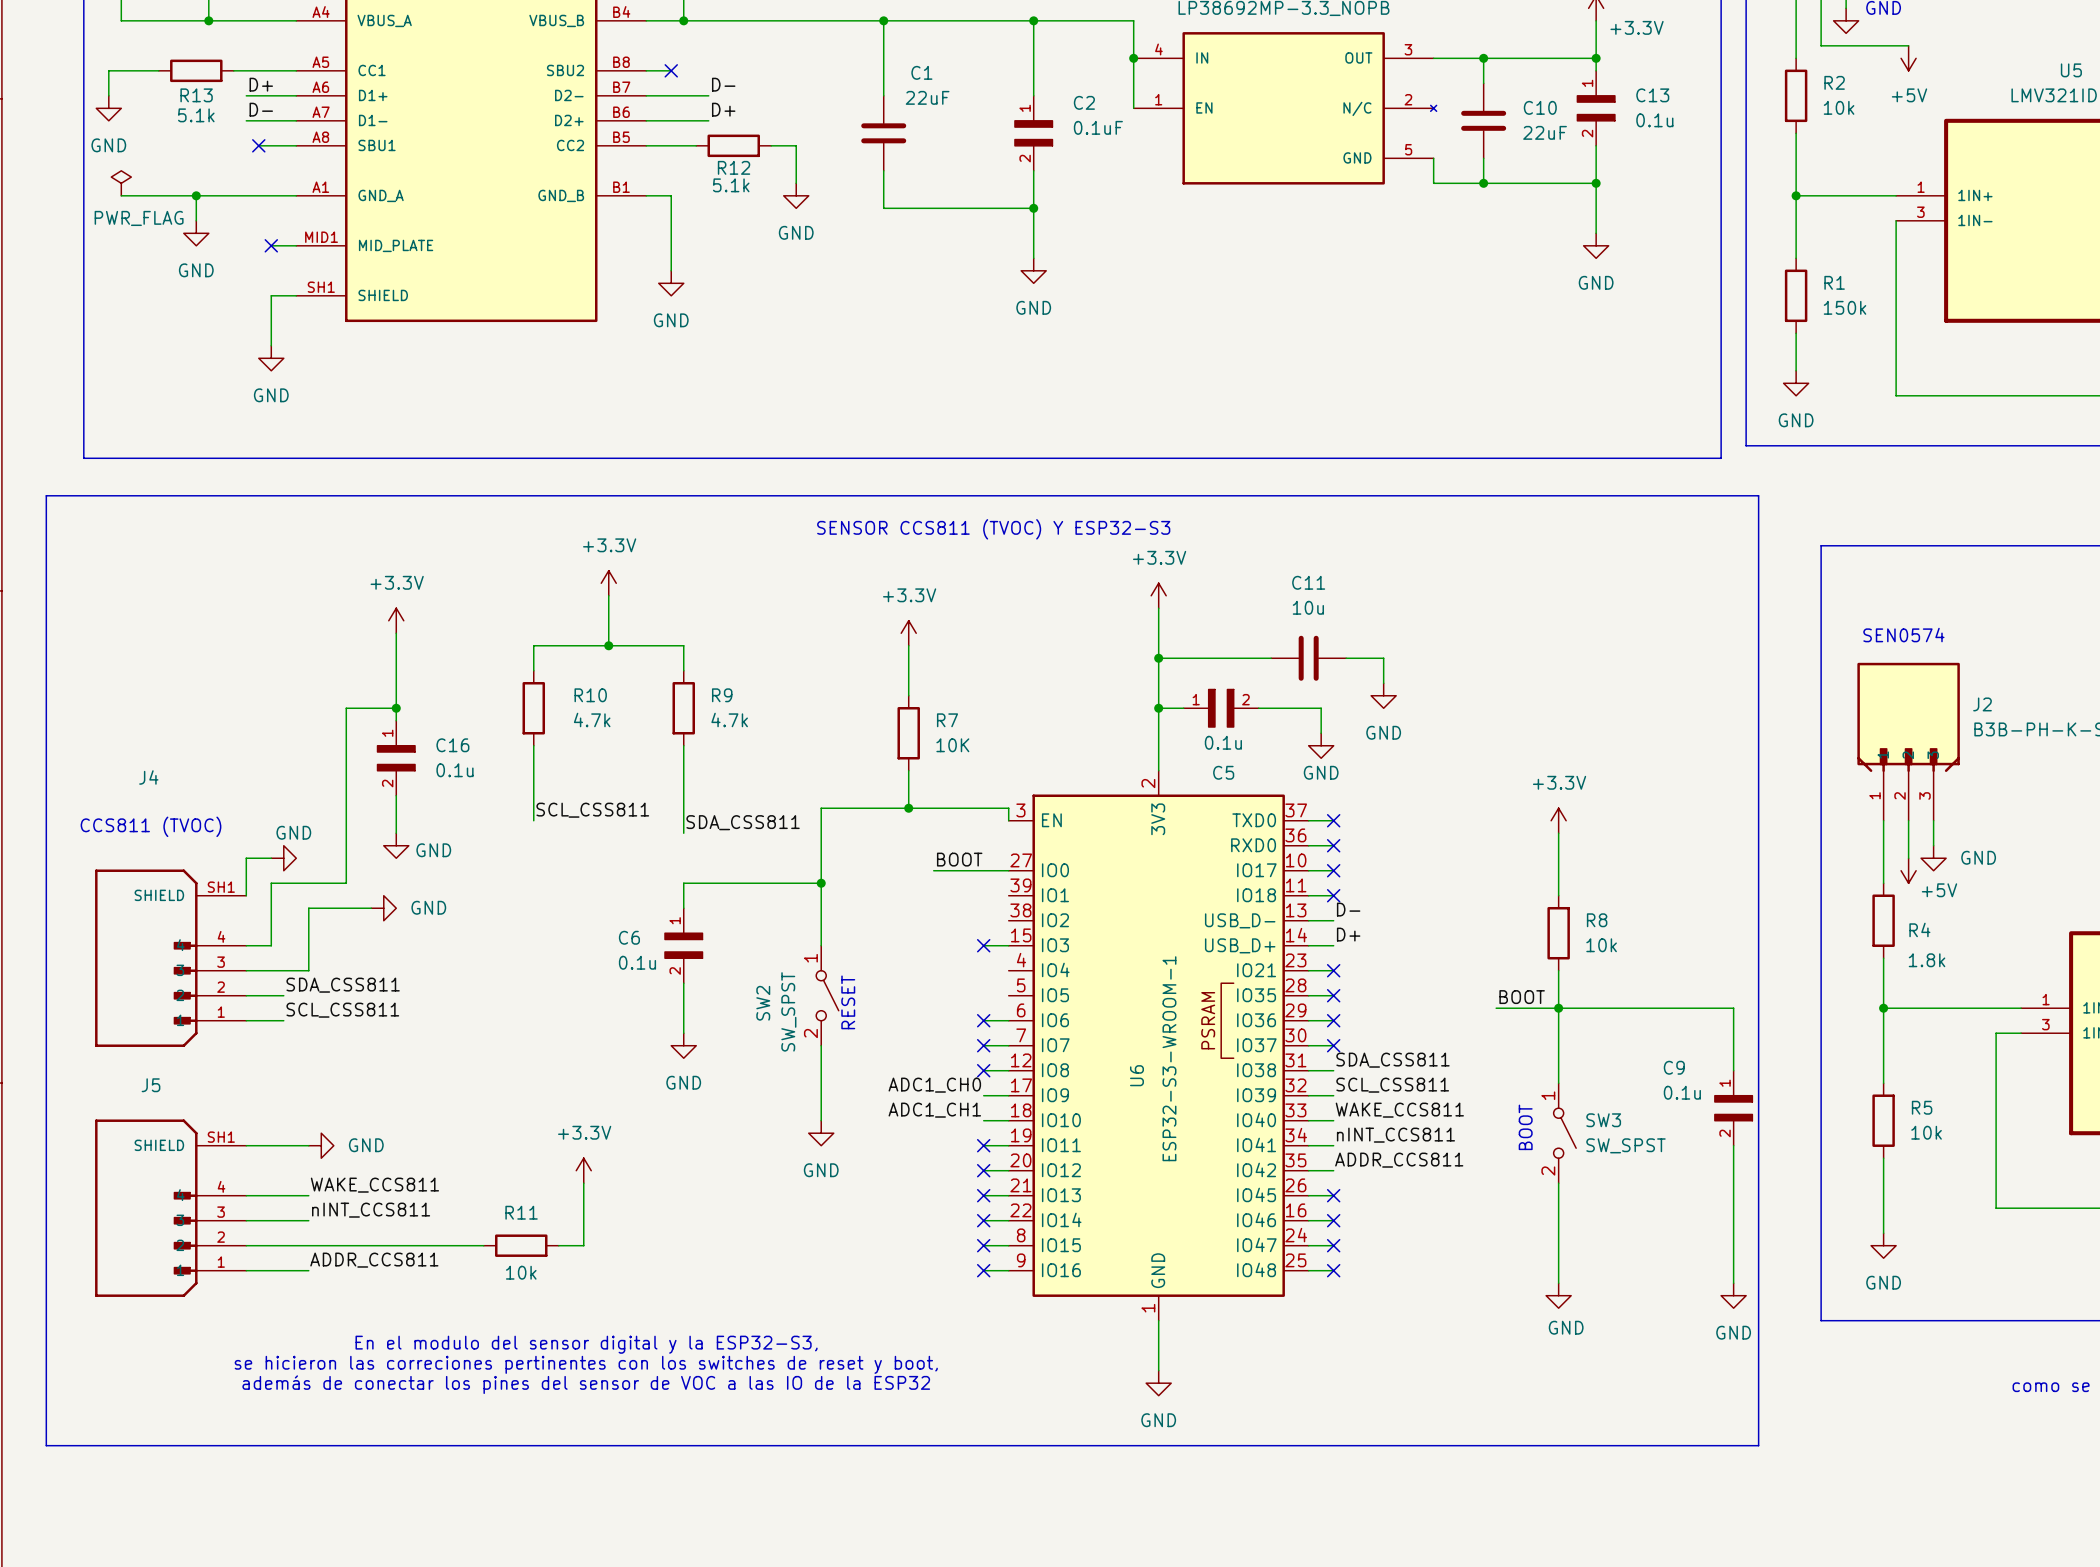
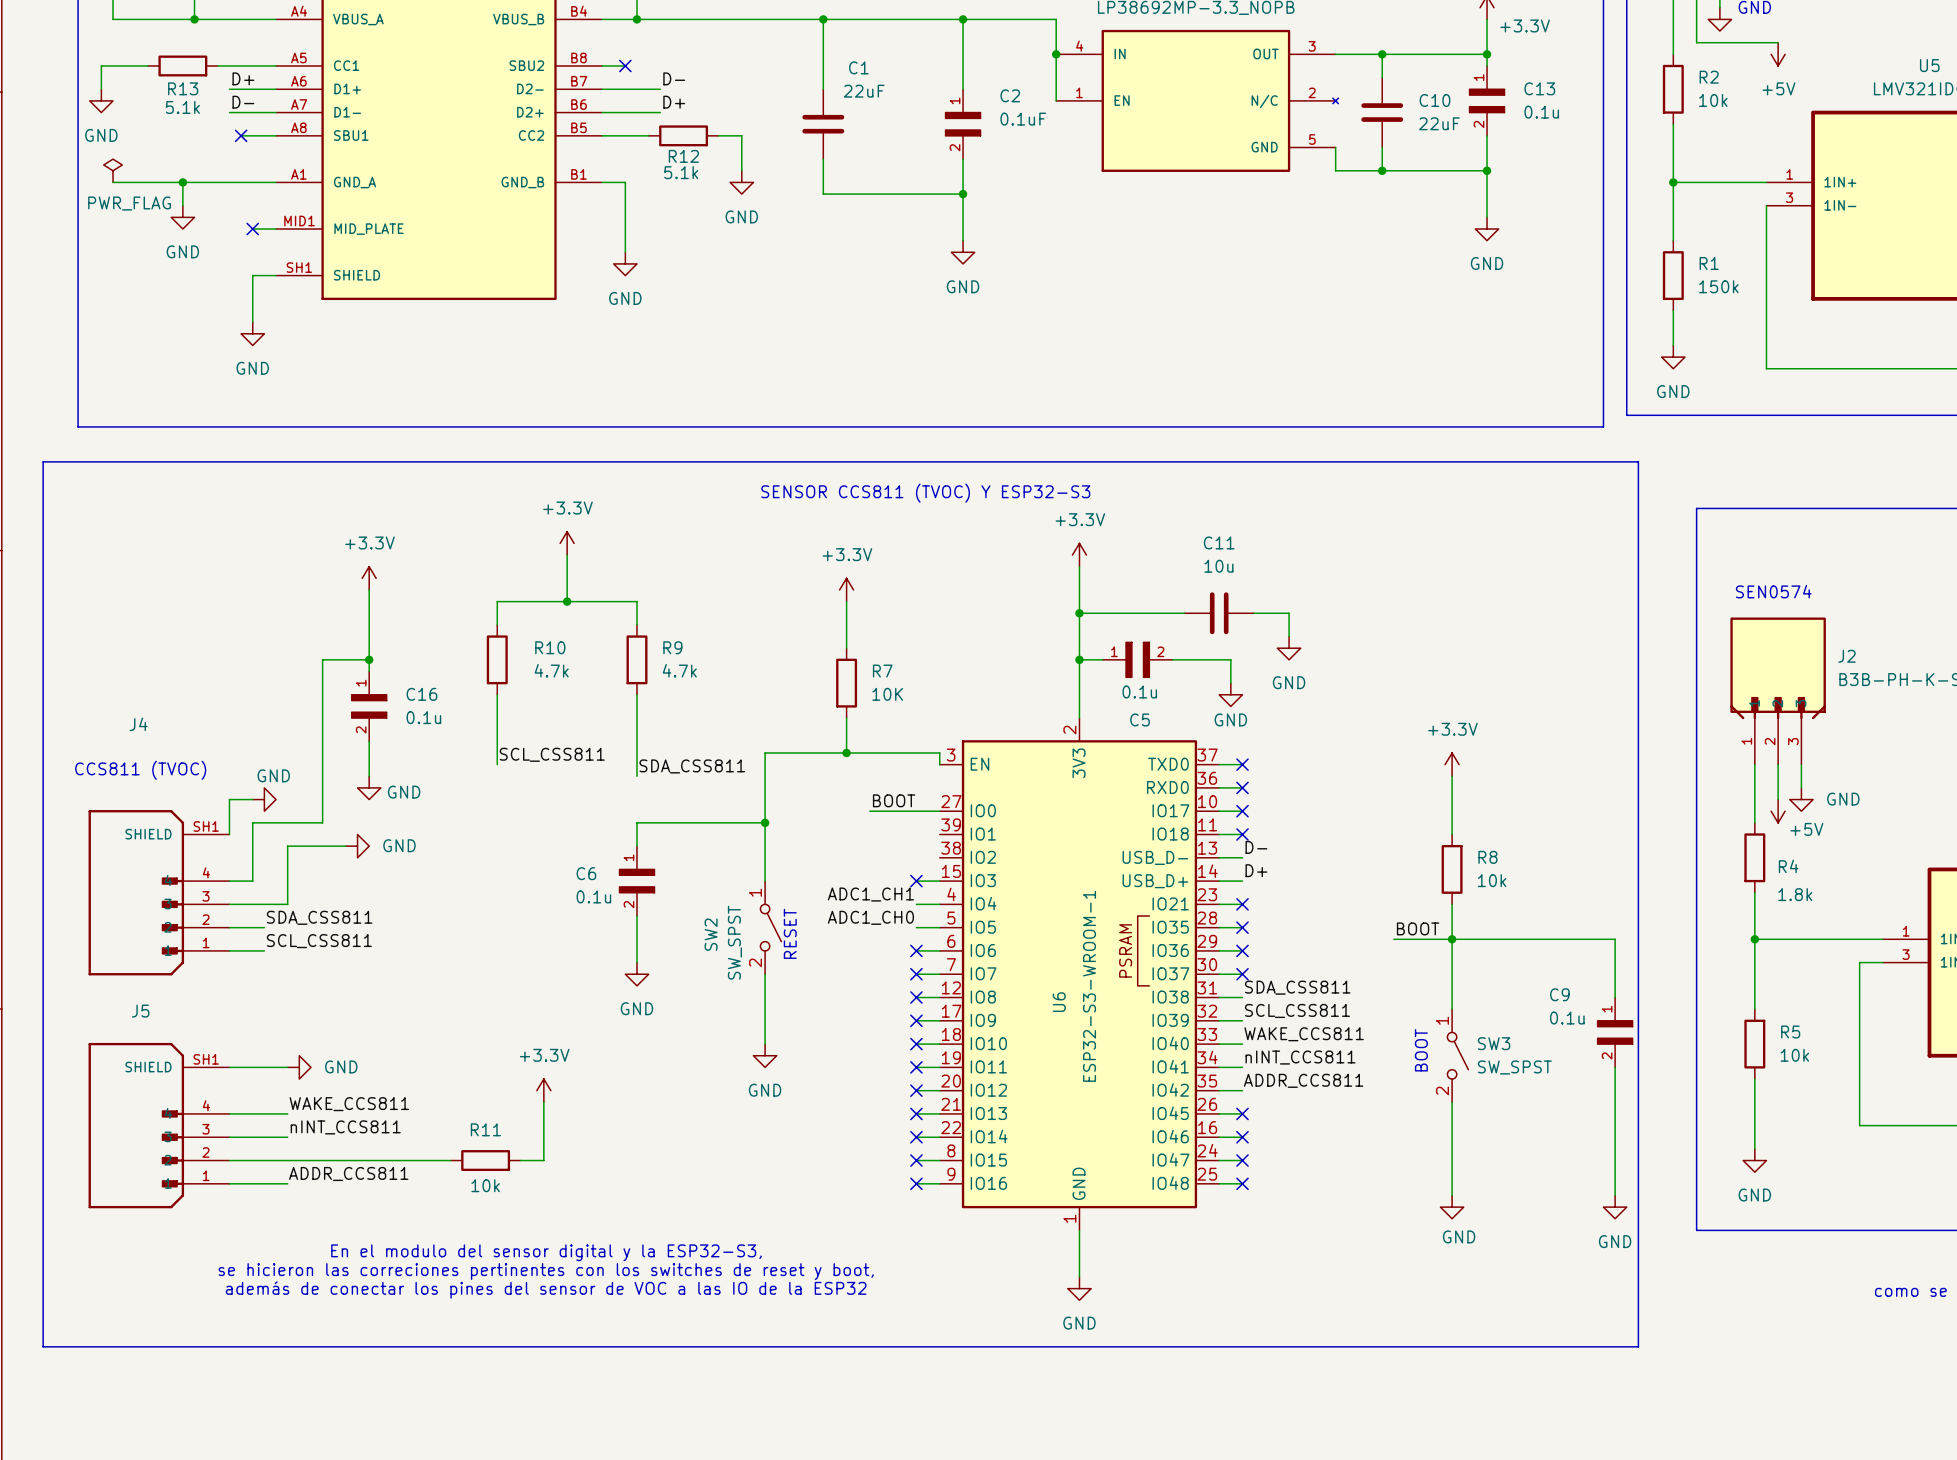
wire: none -> (916, 904) (939, 904)
wire: none -> (916, 927) (939, 927)
label position: ADC1_CH0 (934, 1085) -> ADC1_CH0 (870, 917)
no-connect mark: none -> (916, 1020)
label position: ADC1_CH1 (934, 1110) -> ADC1_CH1 (870, 894)
no-connect mark: none -> (916, 1044)

